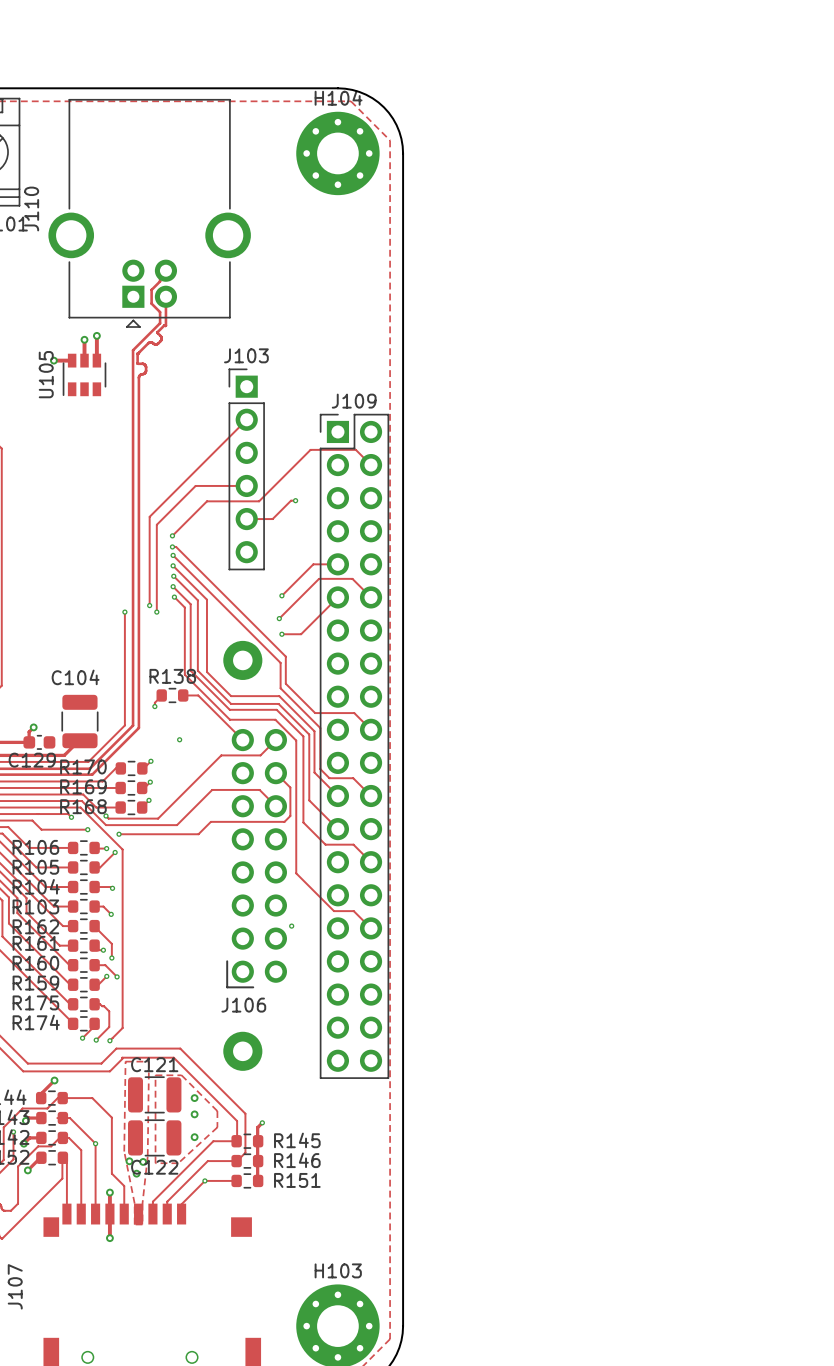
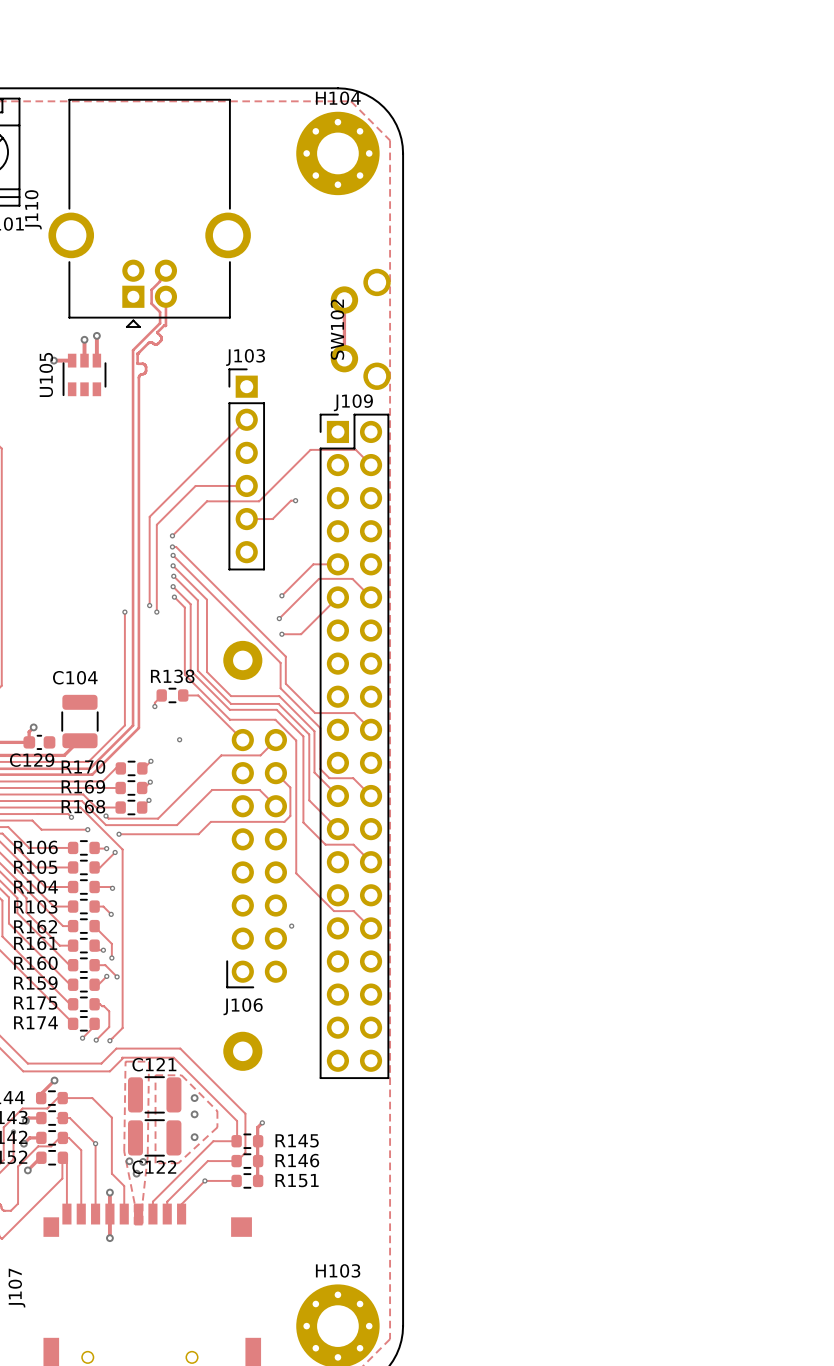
track: none -> (344, 300) (344, 358)
SW102: none -> (360, 329)

